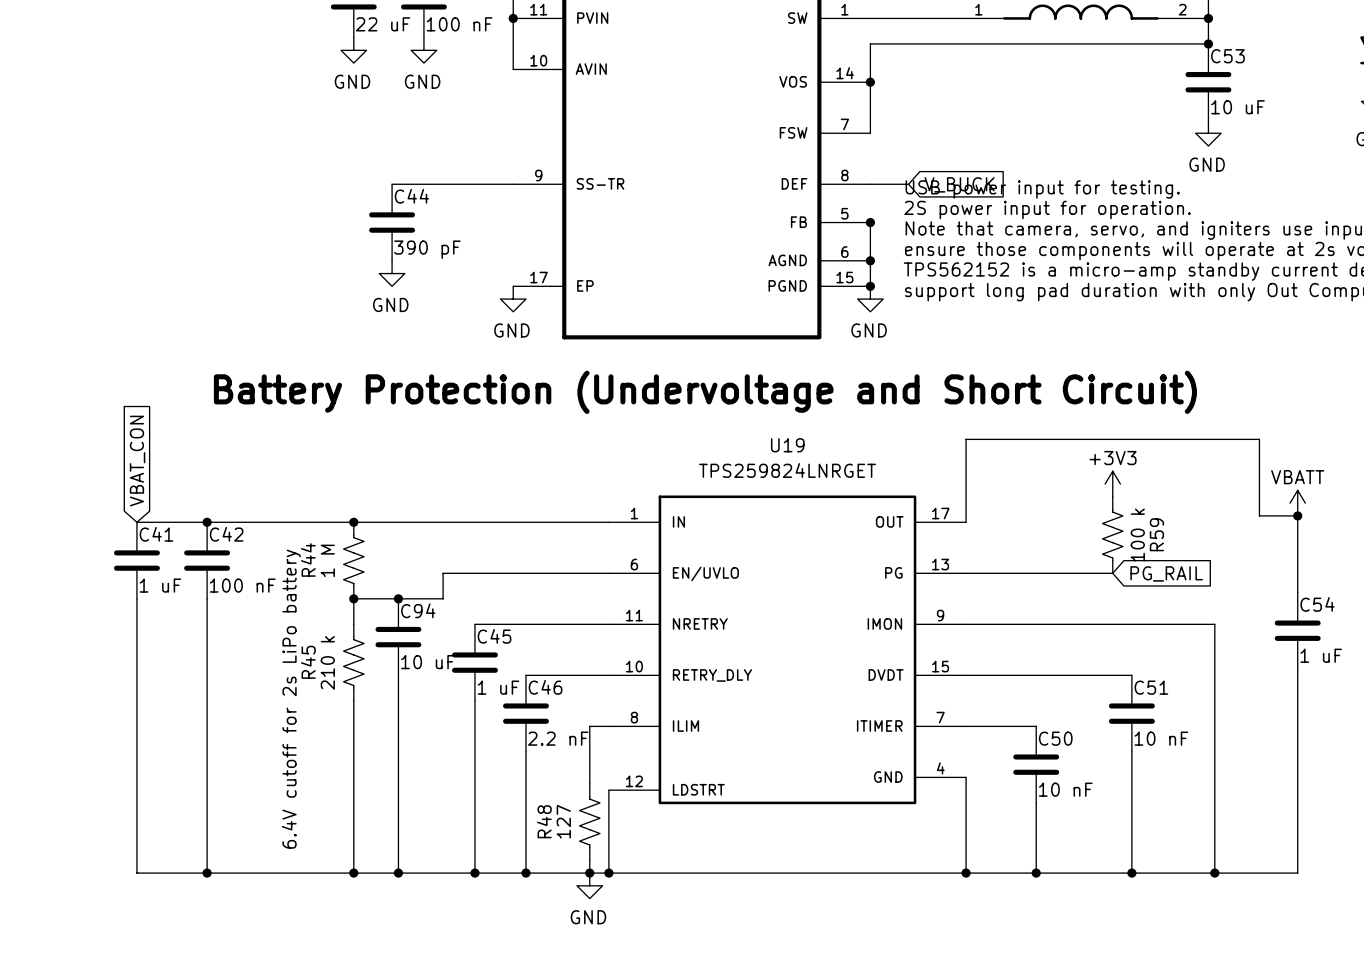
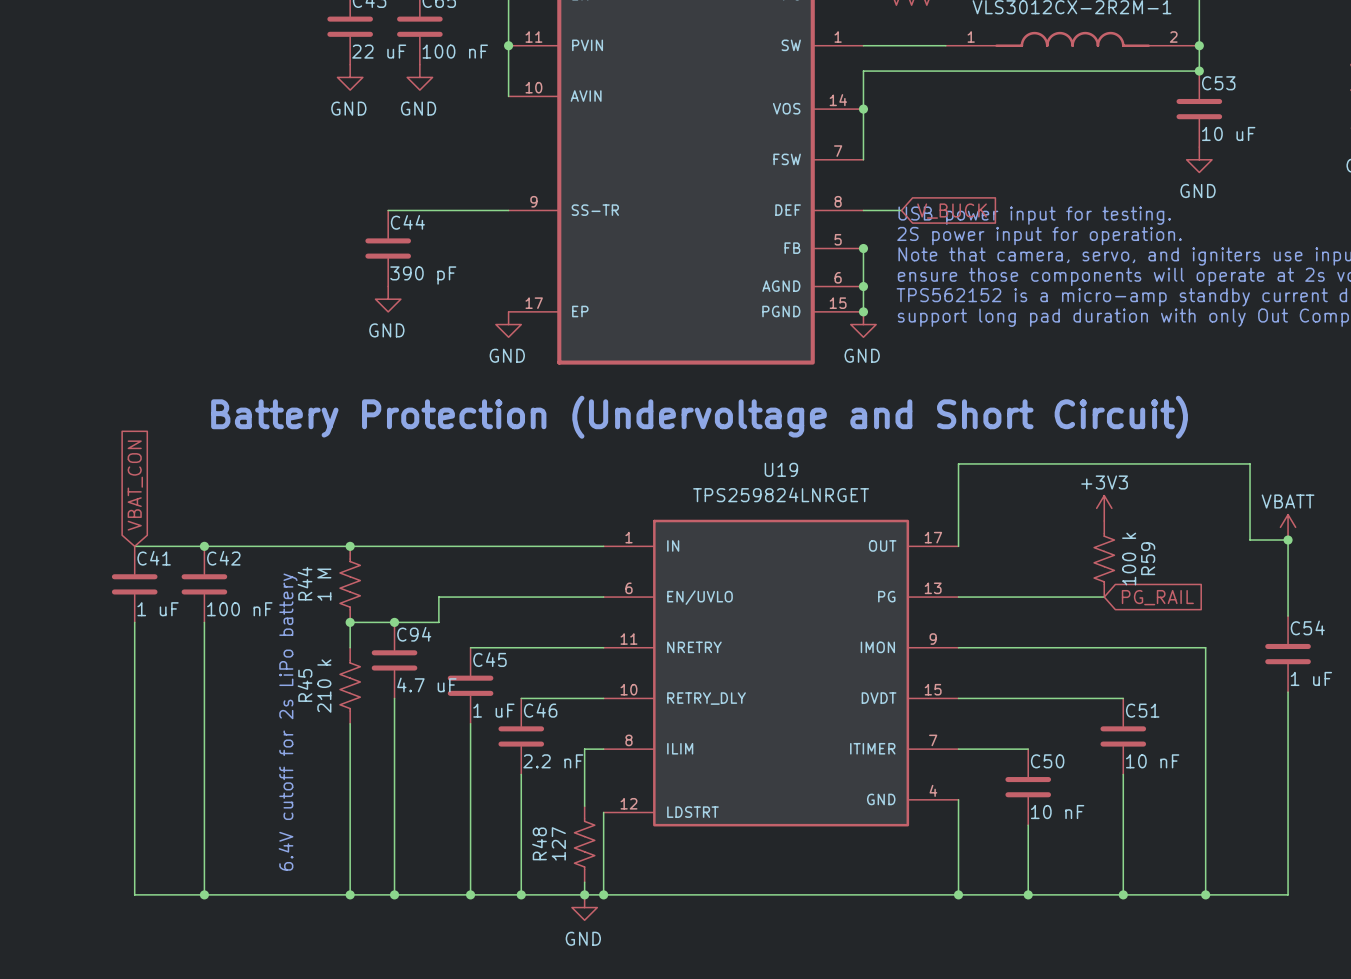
C94 value: 10 uF (427, 662) -> 4.7 uF (426, 684)

